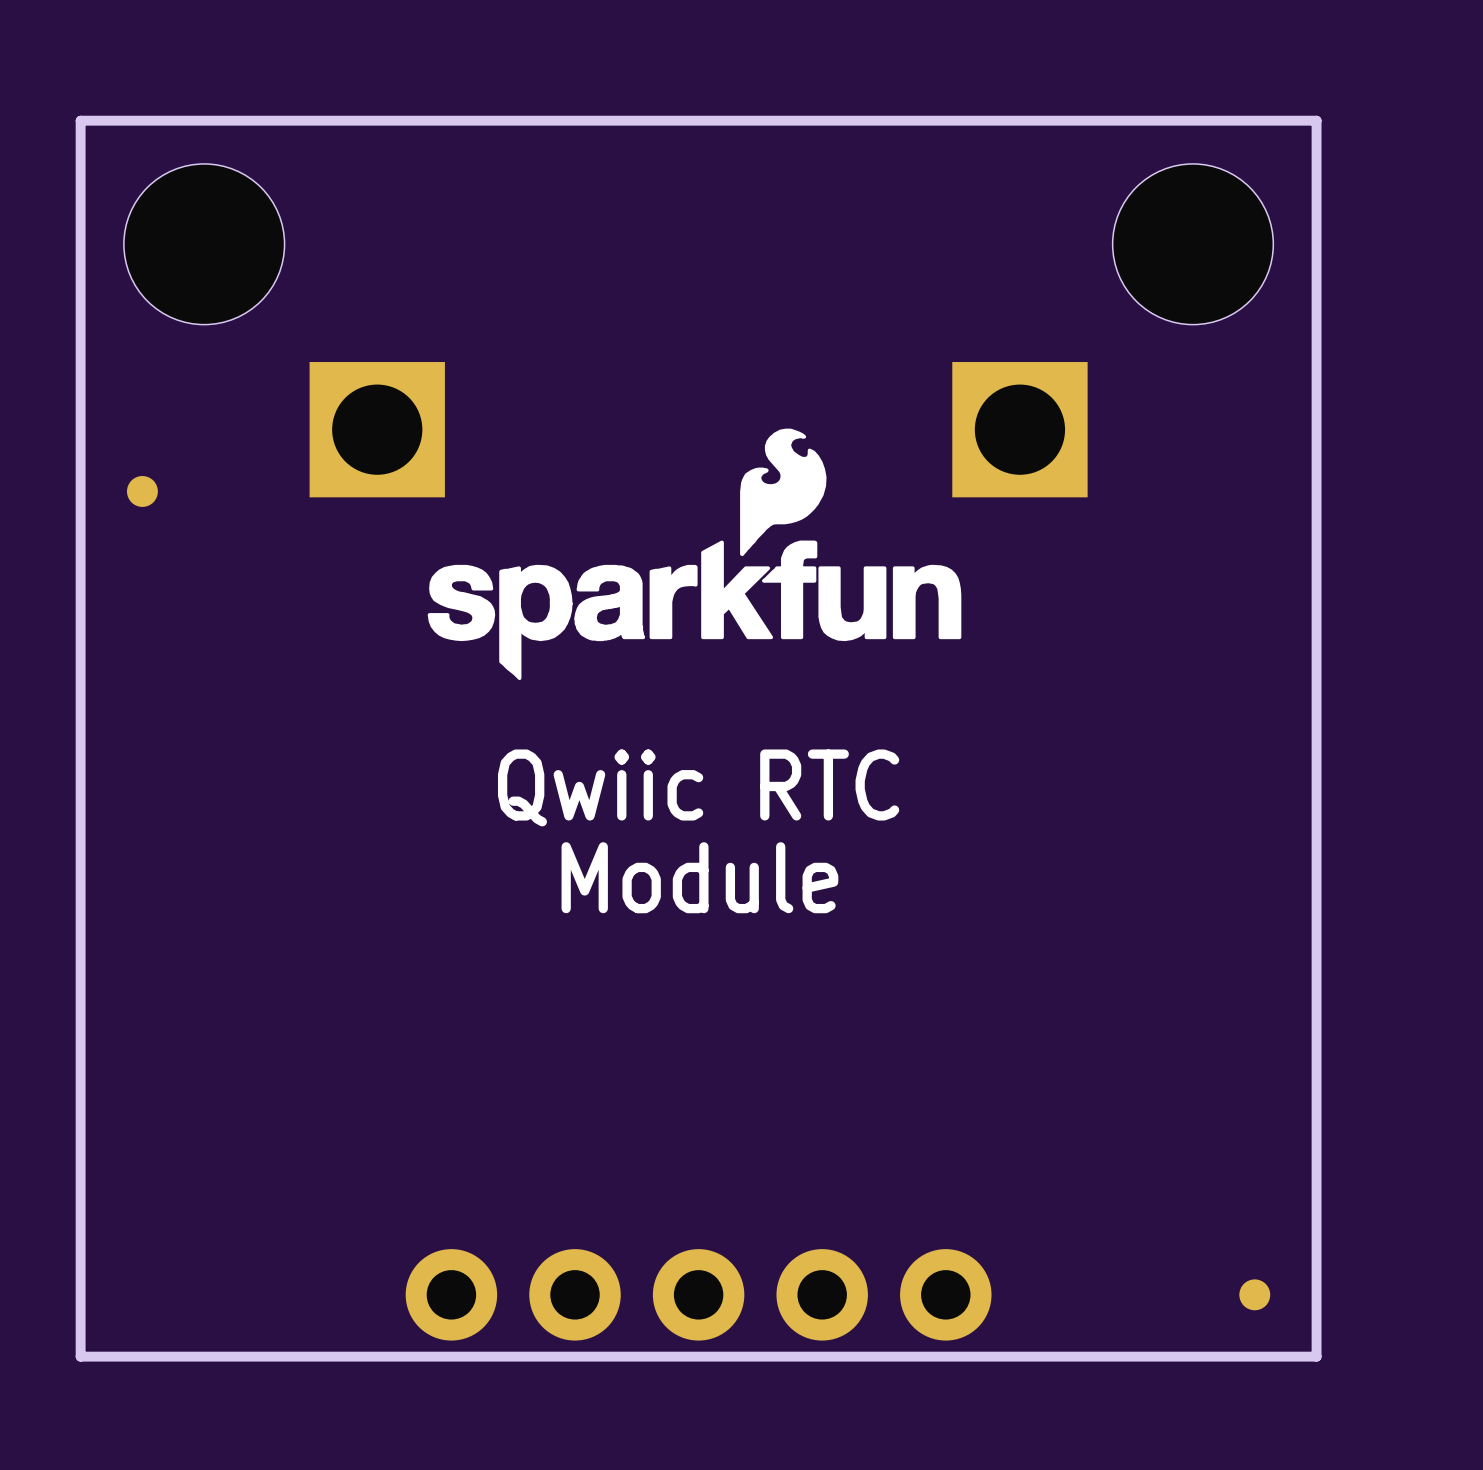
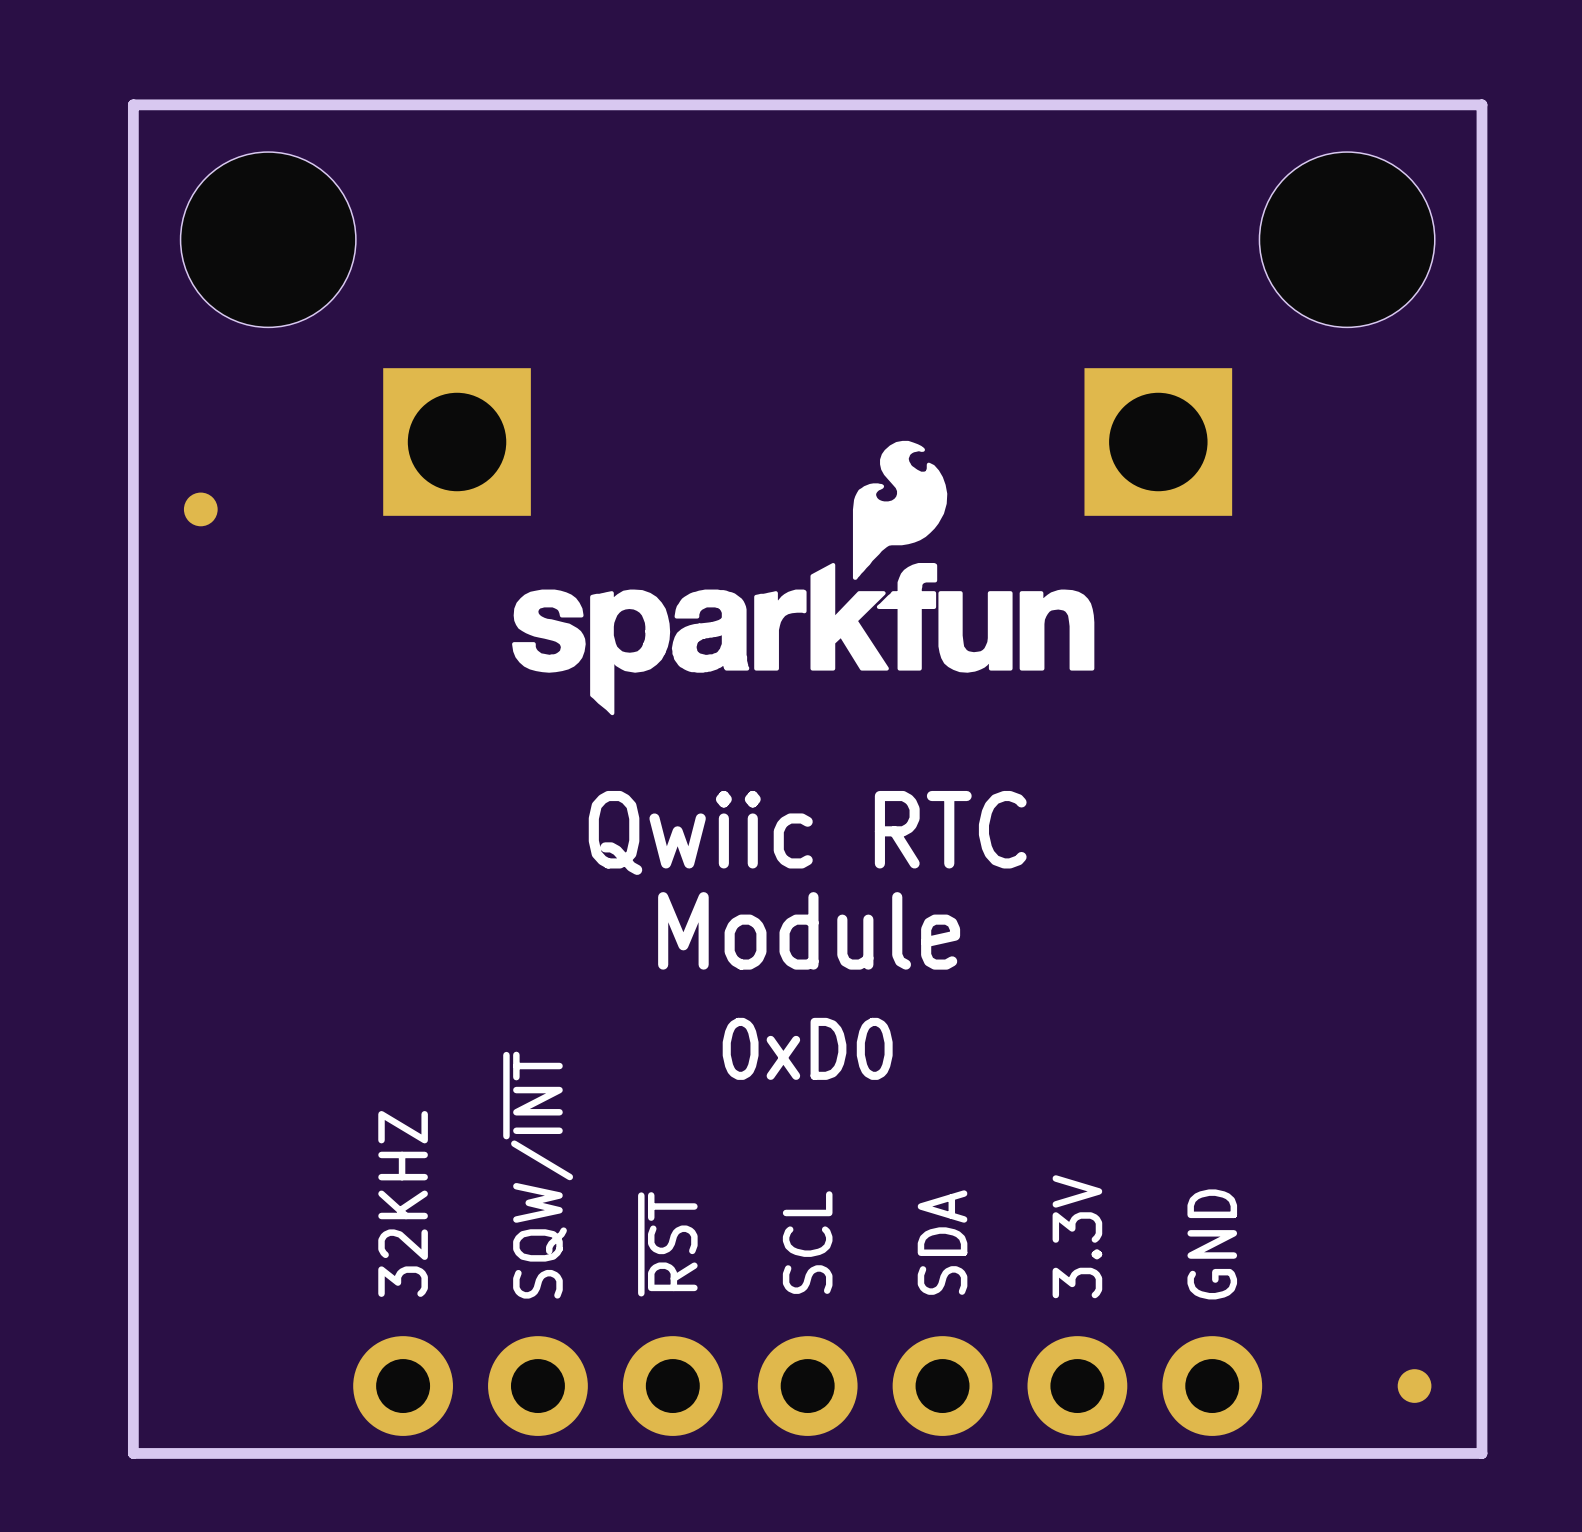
text: none -> 0xD0 (807, 1048)
text: none -> SQW/~{INT} (538, 1175)
text: none -> 32KHZ (403, 1203)
text: none -> 3.3V (1077, 1236)
text: none -> SCL (807, 1242)
text: none -> SDA (942, 1242)
text: none -> ~{RST} (667, 1244)
text: none -> GND (1212, 1244)
part footprint: [405, 1249, 498, 1341] -> [353, 1336, 723, 1436]
part position: (760, 1294) -> (1009, 1386)

